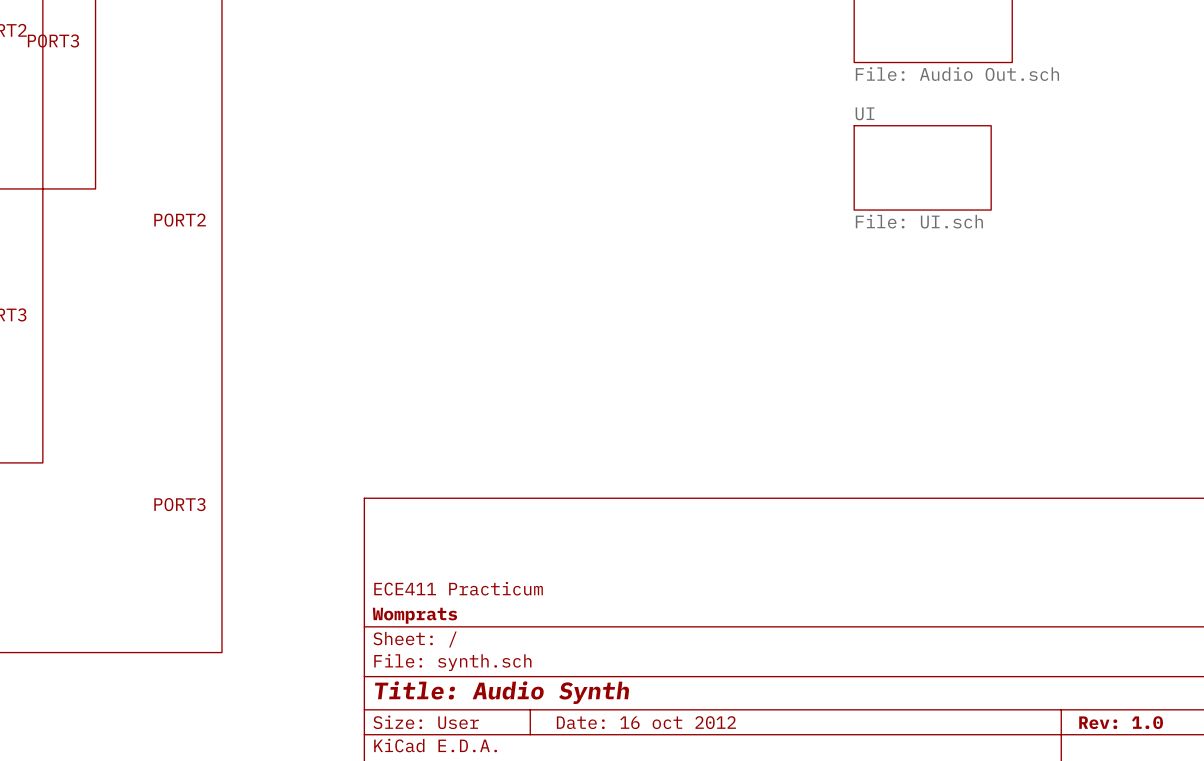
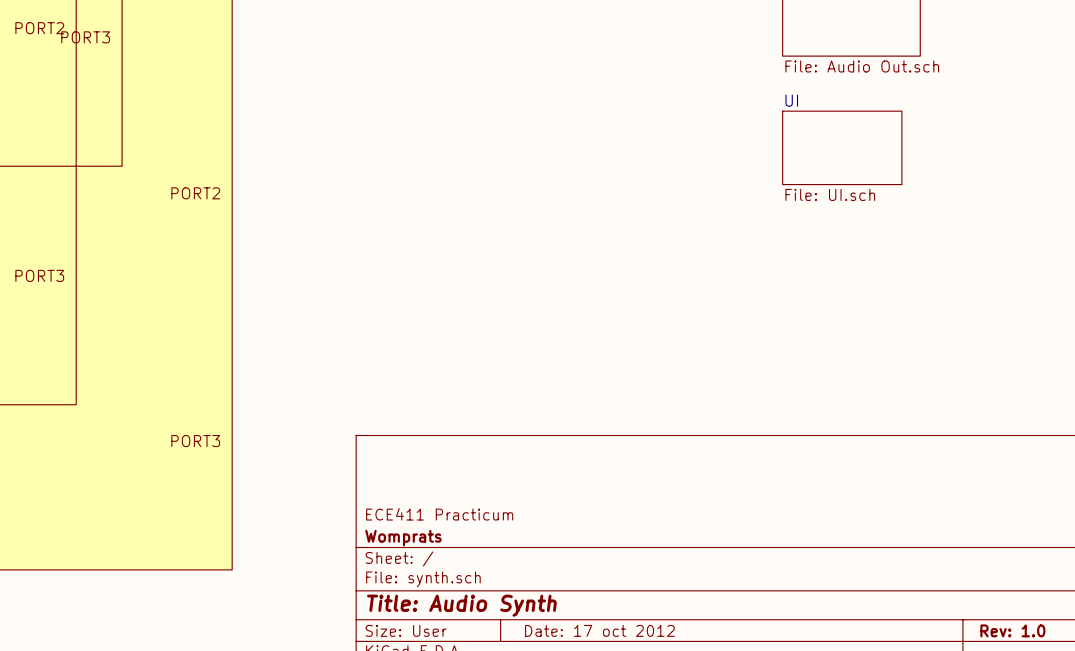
title block: Date: 16 oct 2012 (646, 722) -> Date: 17 oct 2012 (599, 630)

